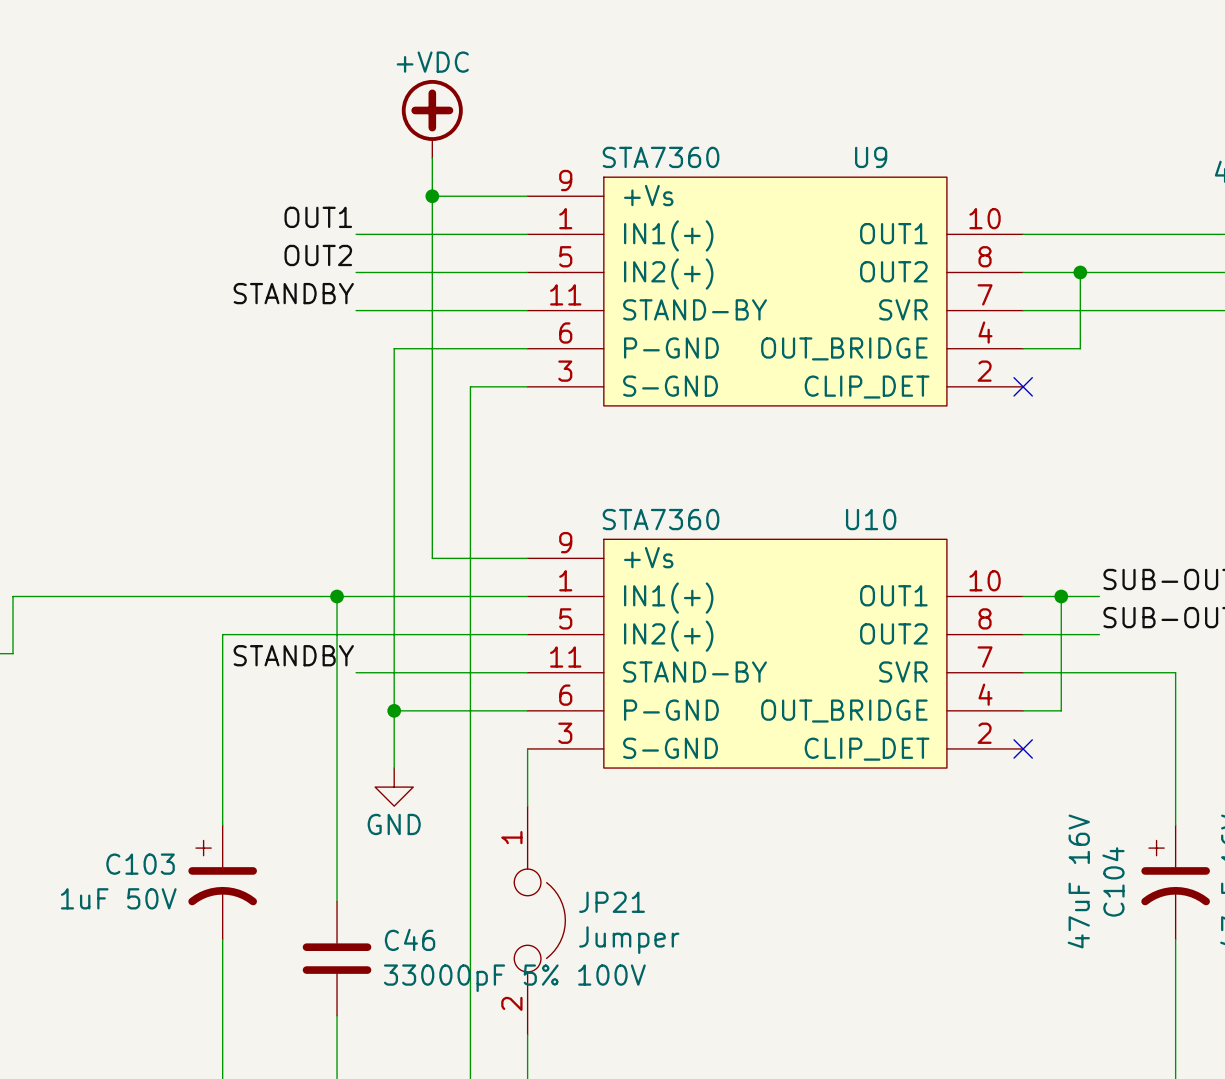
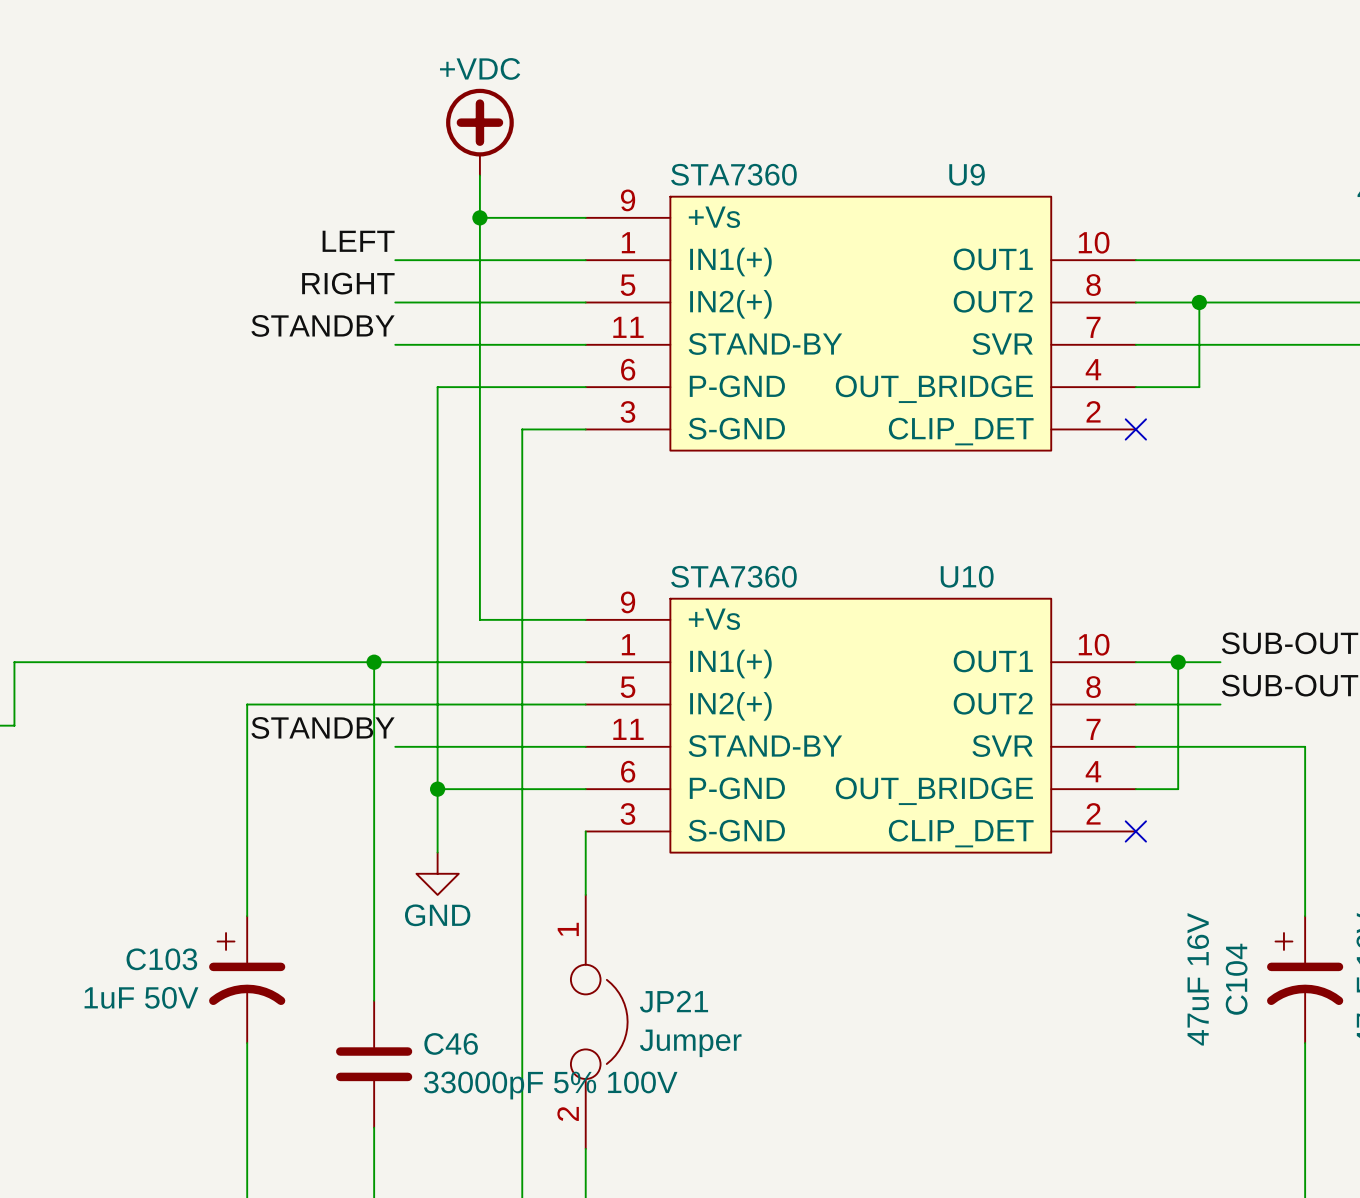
label: OUT1 (318, 217) -> LEFT (358, 241)
label: OUT2 (318, 255) -> RIGHT (348, 283)

